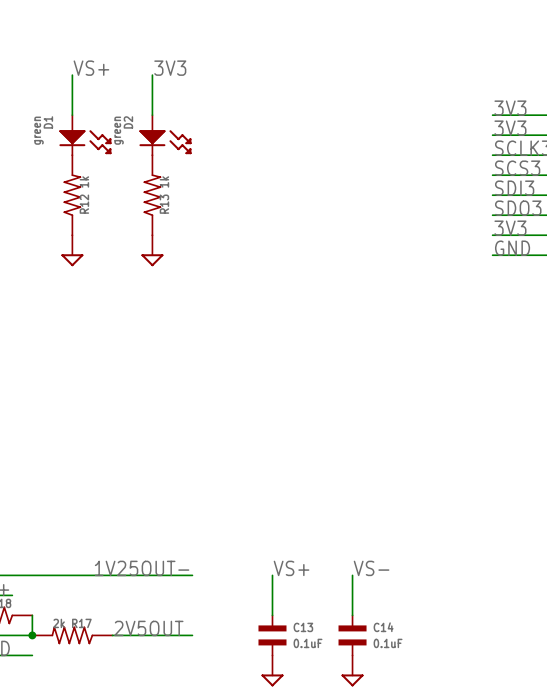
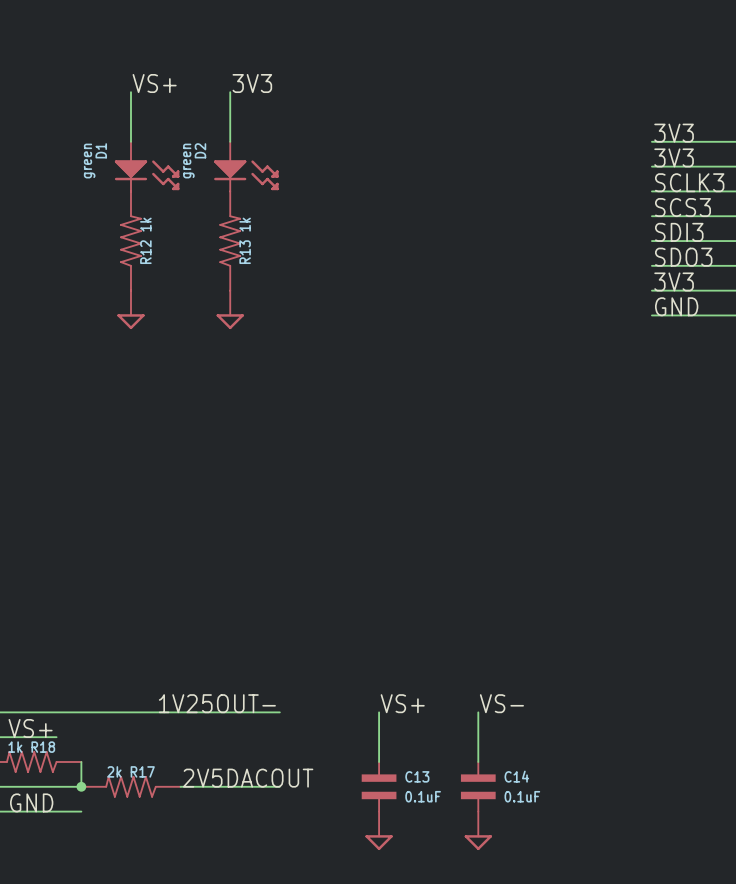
label: 2V5OUT (148, 628) -> 2V5DACOUT (248, 778)

